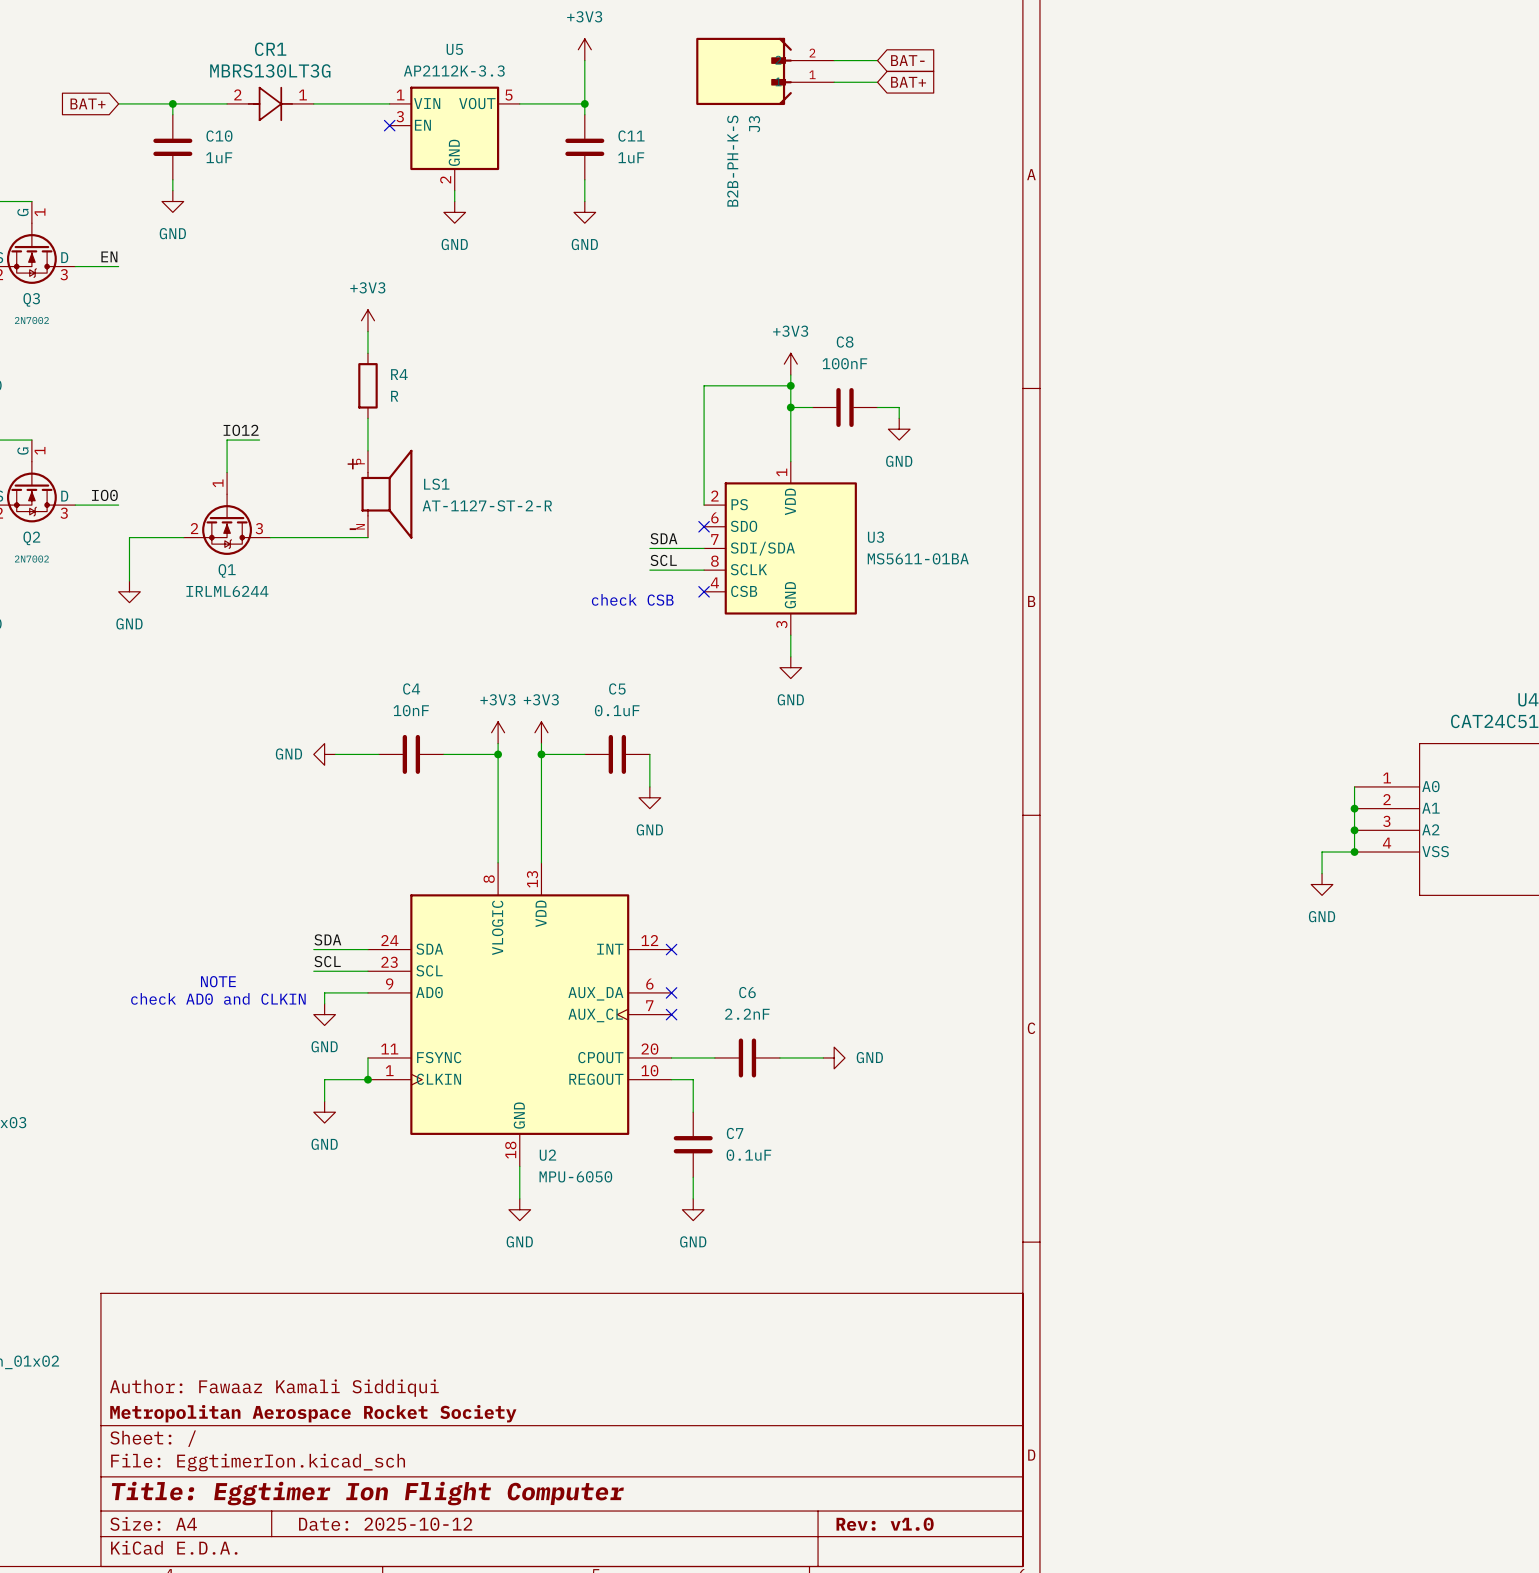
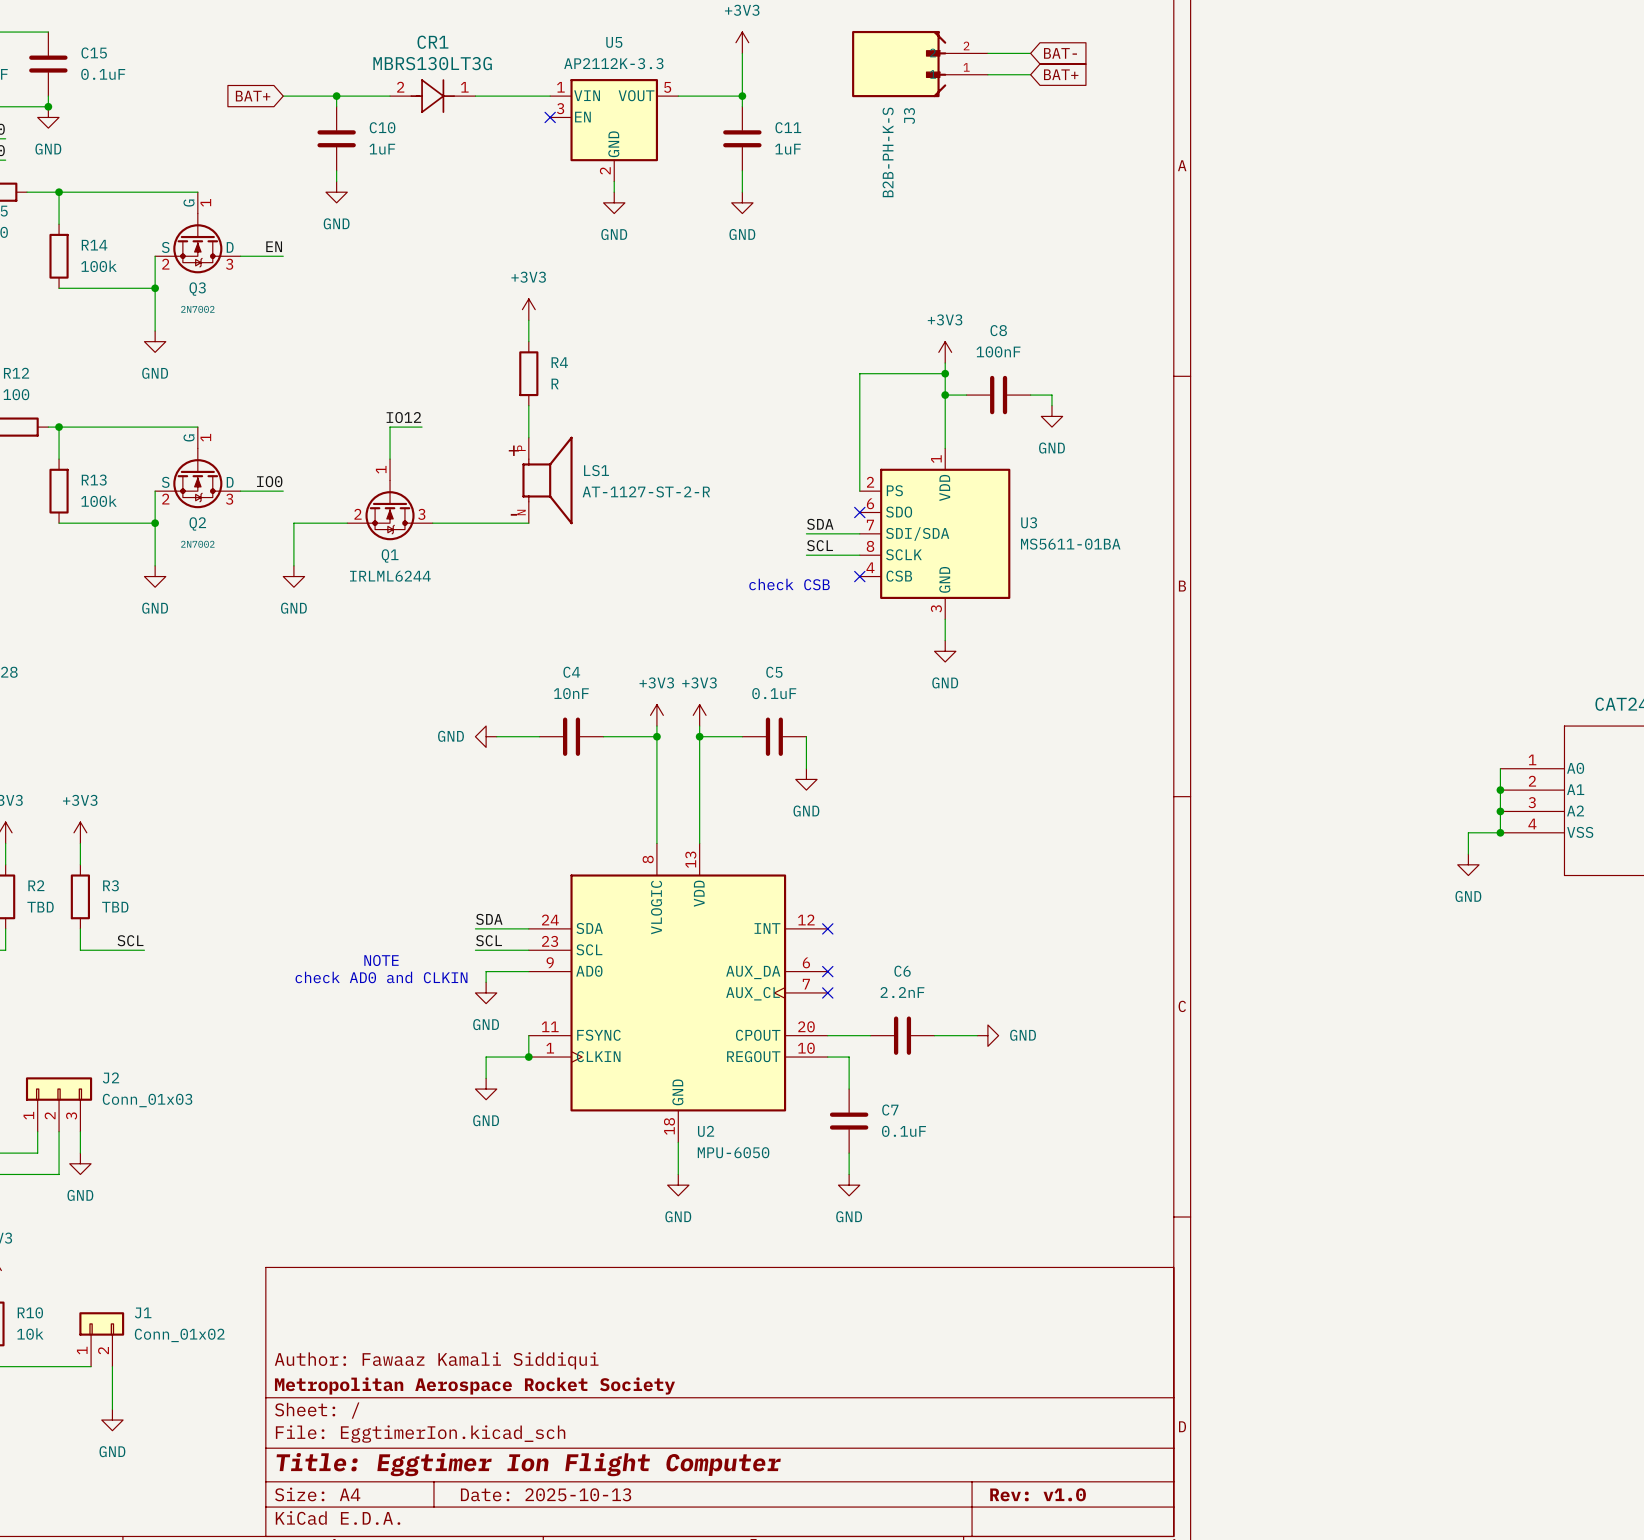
title block: Date: 2025-10-12 (385, 1524) -> Date: 2025-10-13 (546, 1494)

